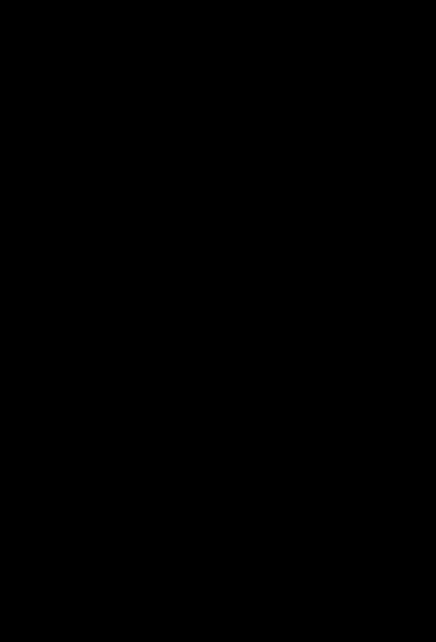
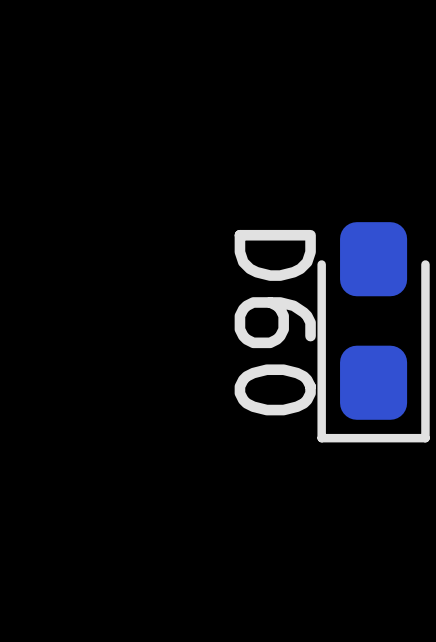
D60: none -> (373, 332)

